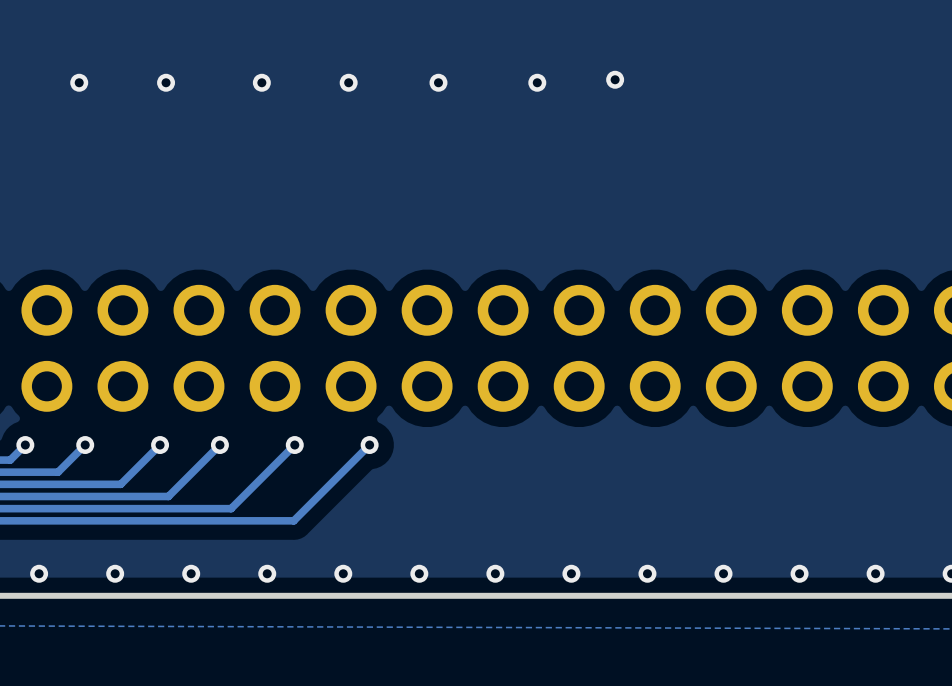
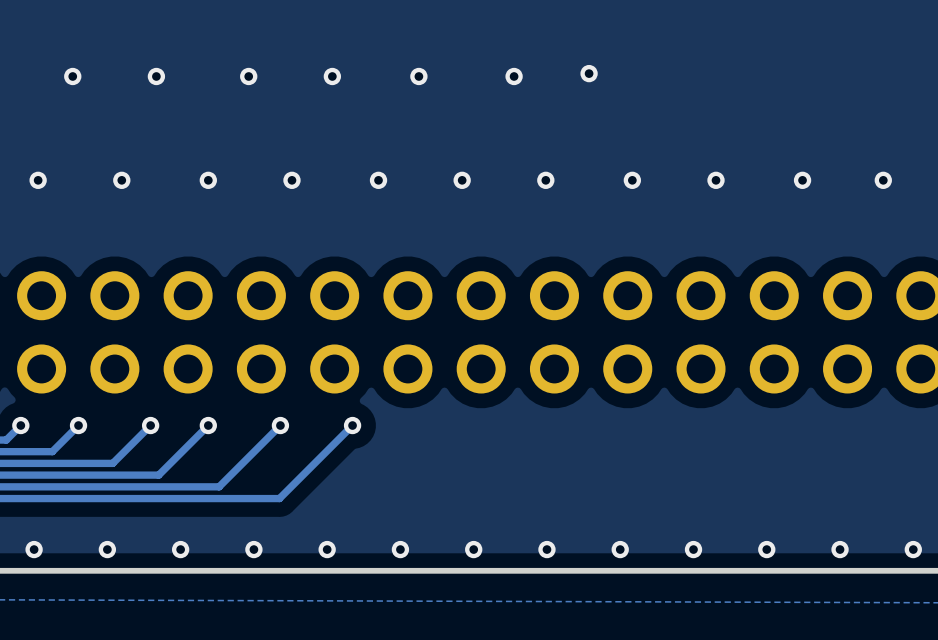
via: none -> (38, 180)
via: none -> (121, 180)
via: none -> (208, 180)
via: none -> (291, 180)
via: none -> (378, 180)
via: none -> (462, 180)
via: none -> (545, 180)
via: none -> (632, 180)
via: none -> (716, 180)
via: none -> (802, 180)
via: none -> (883, 180)

